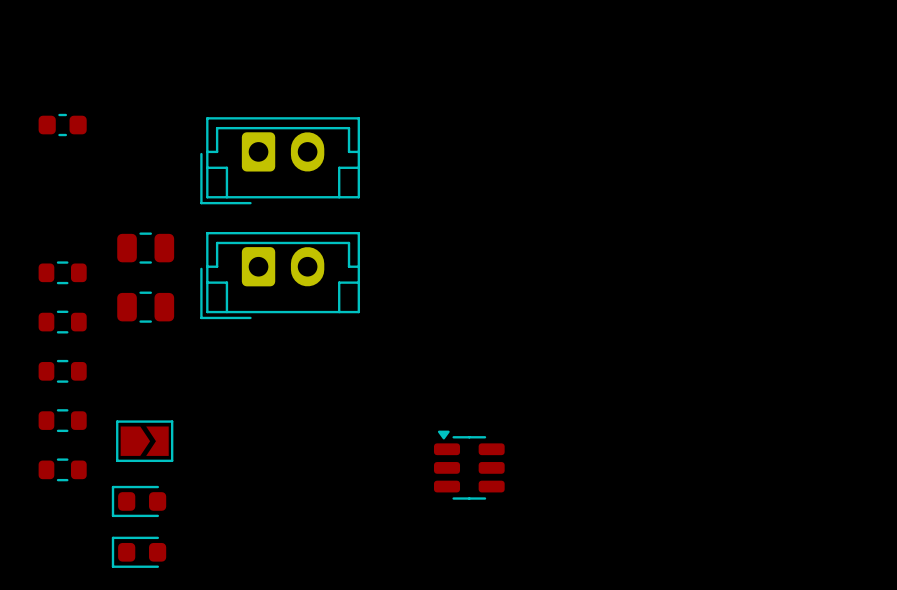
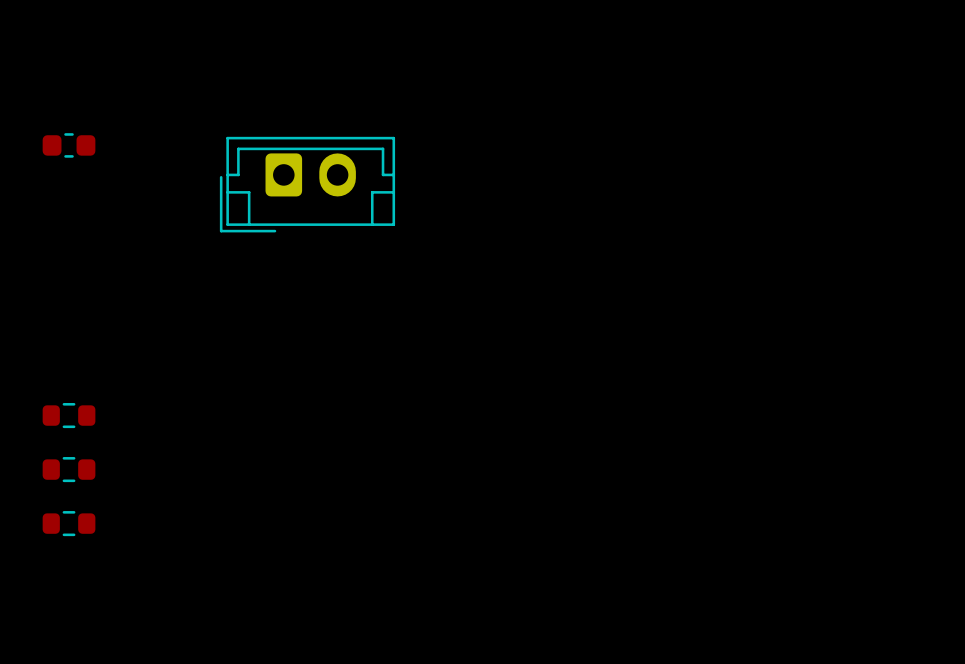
part: (145, 248) -> none
part: (62, 272) -> none
part: (280, 275) -> none
part: (145, 307) -> none
part: (62, 322) -> none
part: (144, 441) -> none
part: (469, 465) -> none
part: (139, 501) -> none
part: (139, 552) -> none

